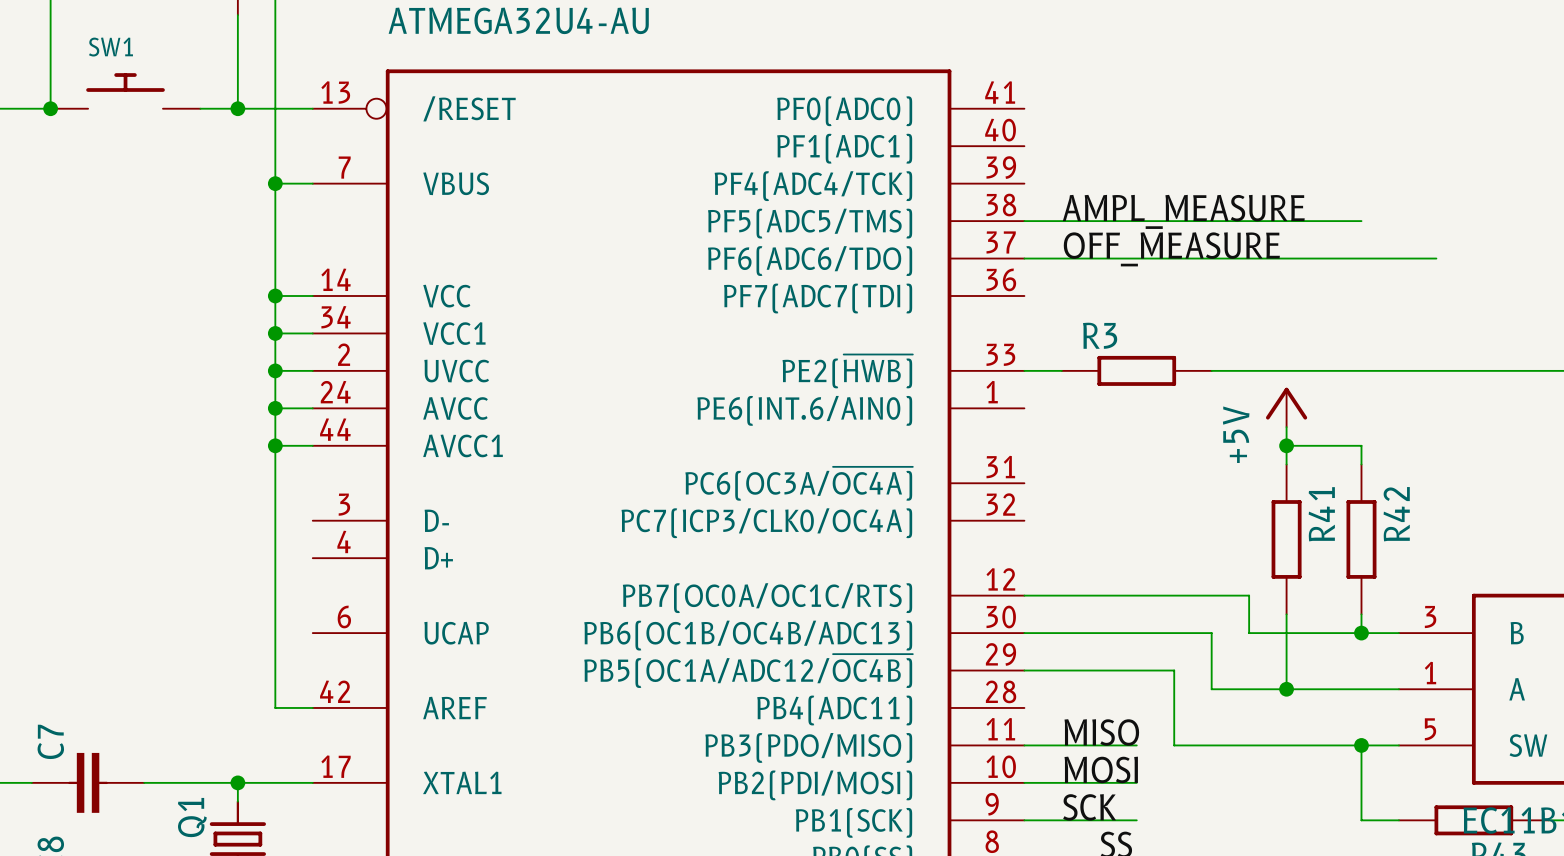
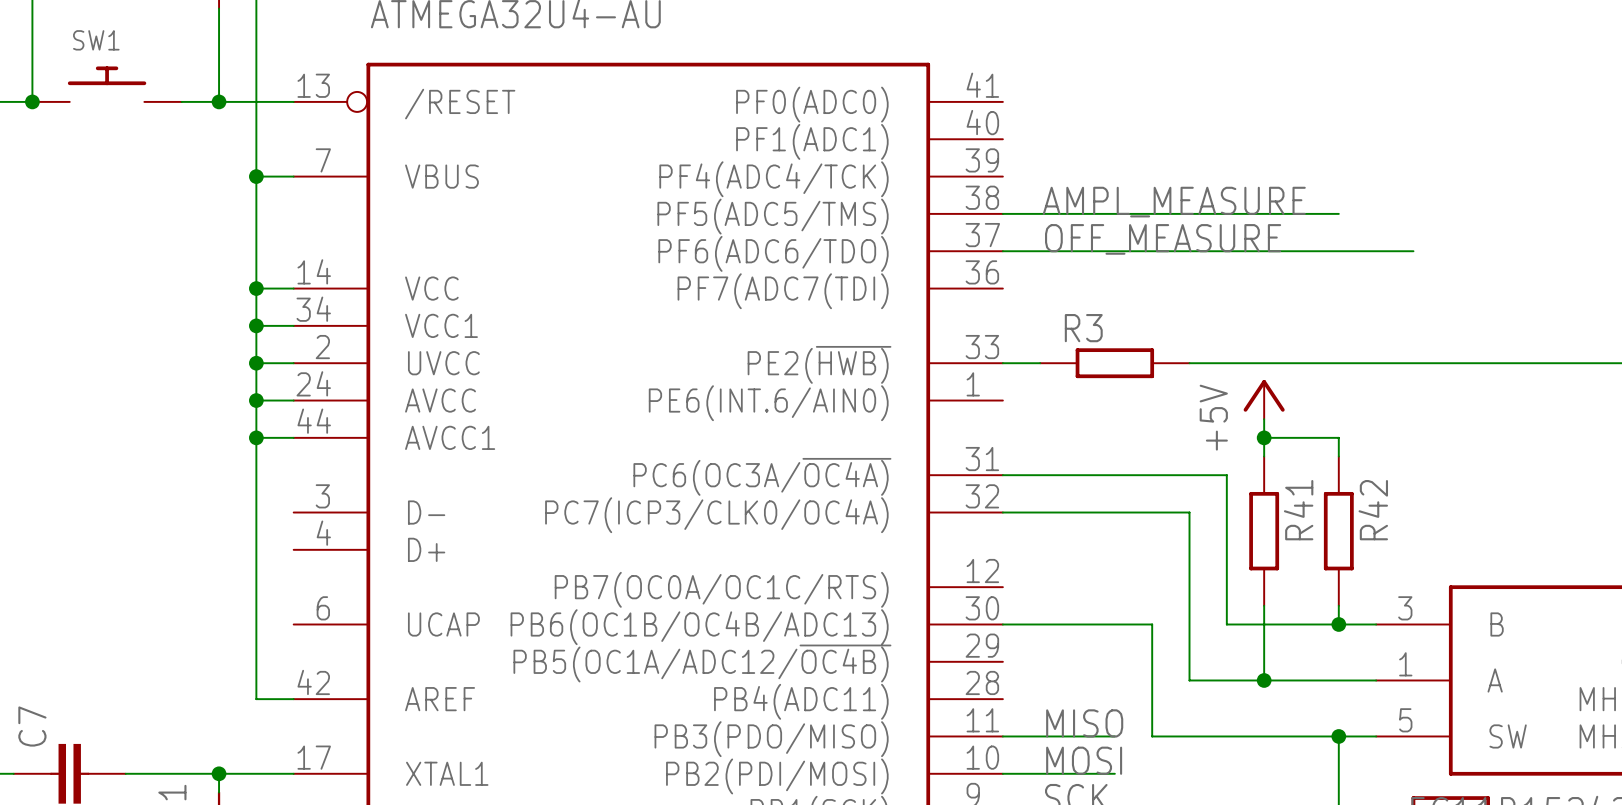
wire: none -> (1002, 512) (1189, 512) (1189, 624)
wire: (1024, 595) (1249, 595) -> (1002, 475) (1226, 475) (1226, 587)
wire: (1174, 633) (1211, 633) -> (1152, 624) (1152, 661)
wire: (1024, 670) (1174, 670) -> none

